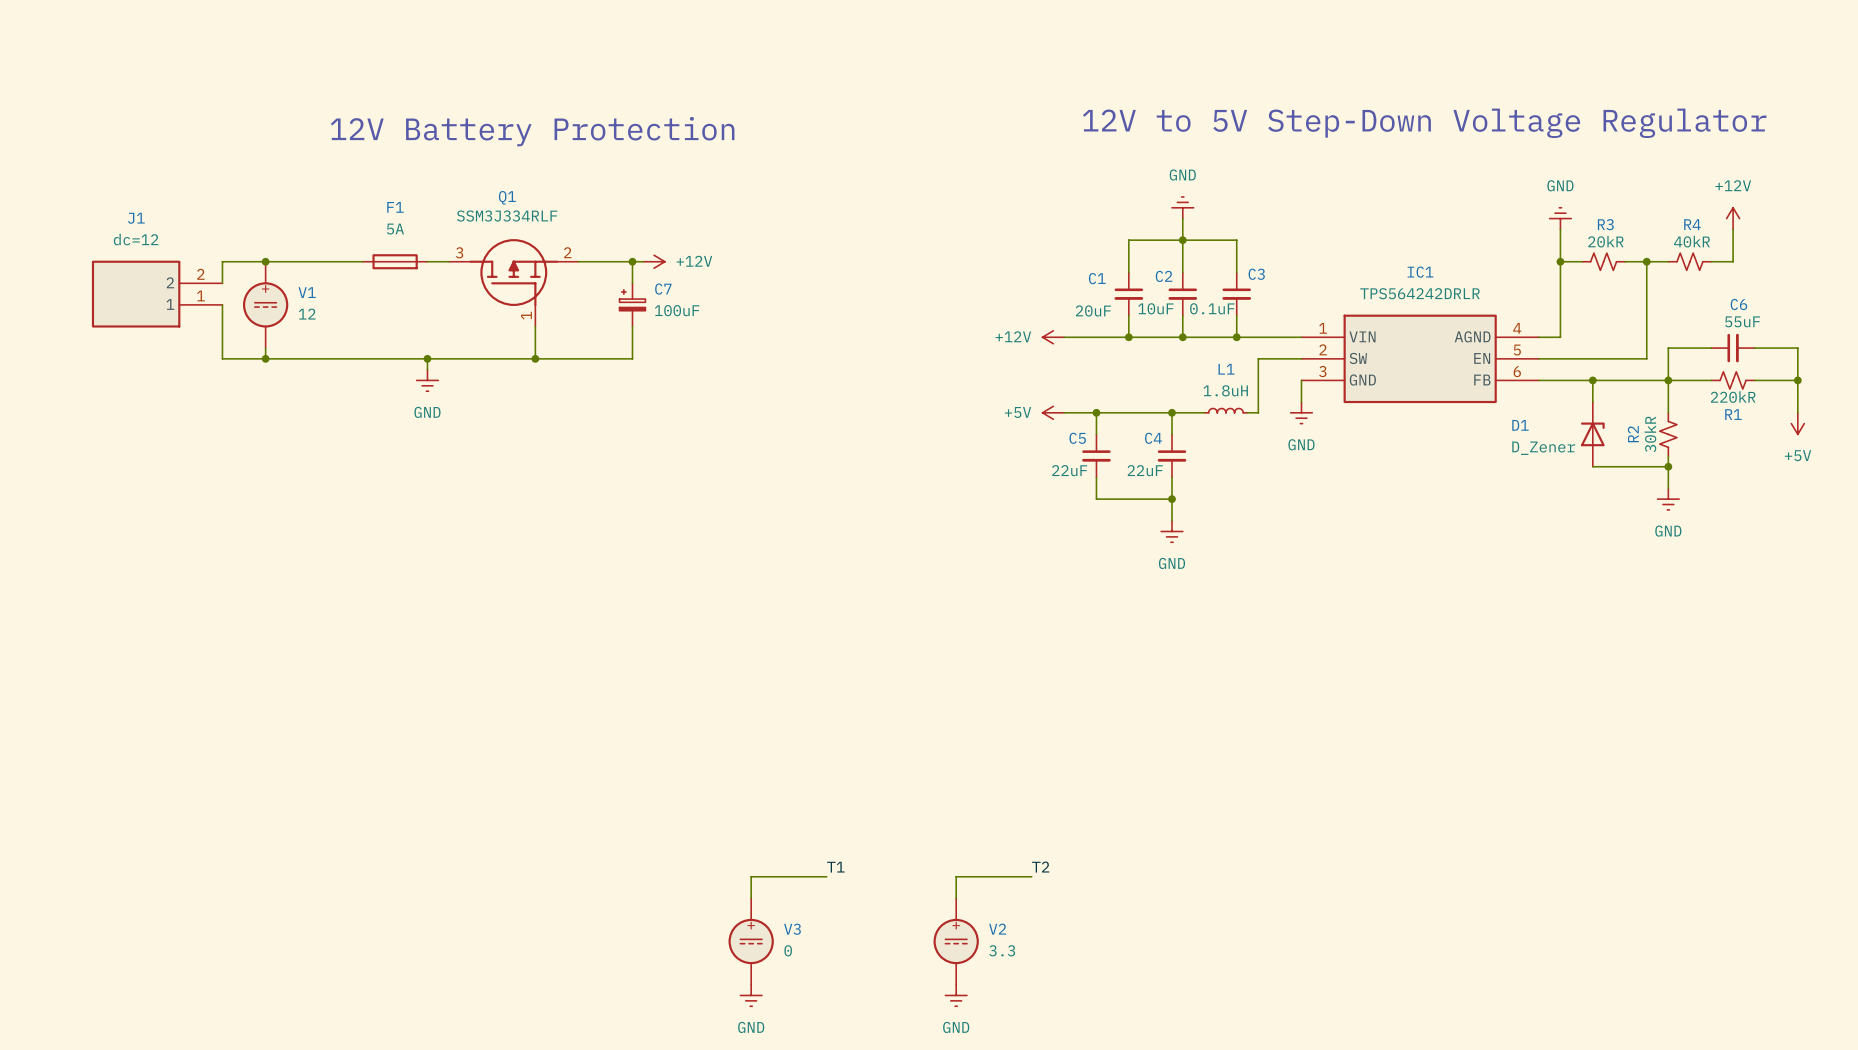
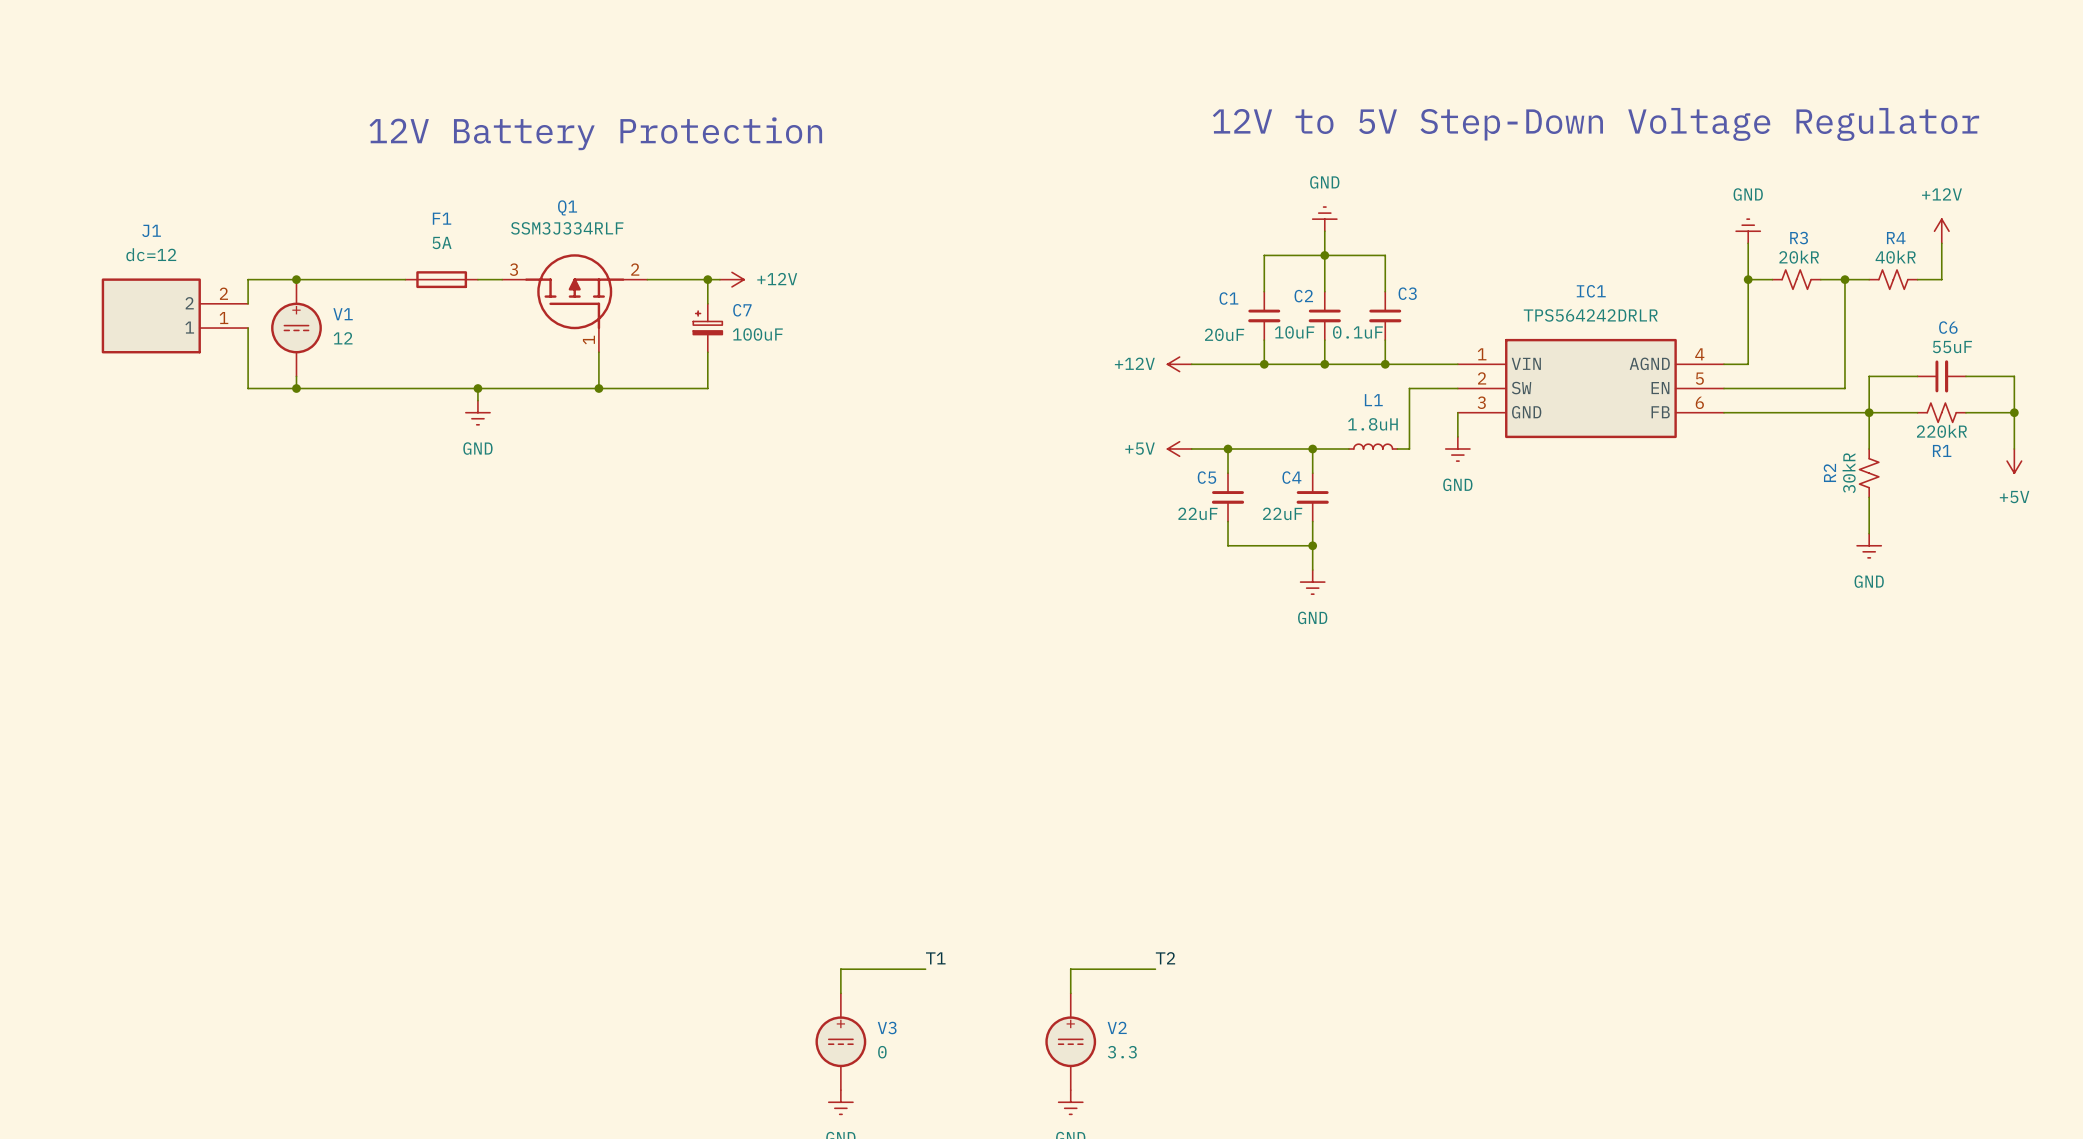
wire: (1592, 380) (1592, 402) -> none
junction: (1592, 380) -> none
D1: D_Zener (1592, 434) -> none
wire: (1592, 466) (1668, 466) -> none
junction: (1668, 466) -> none

